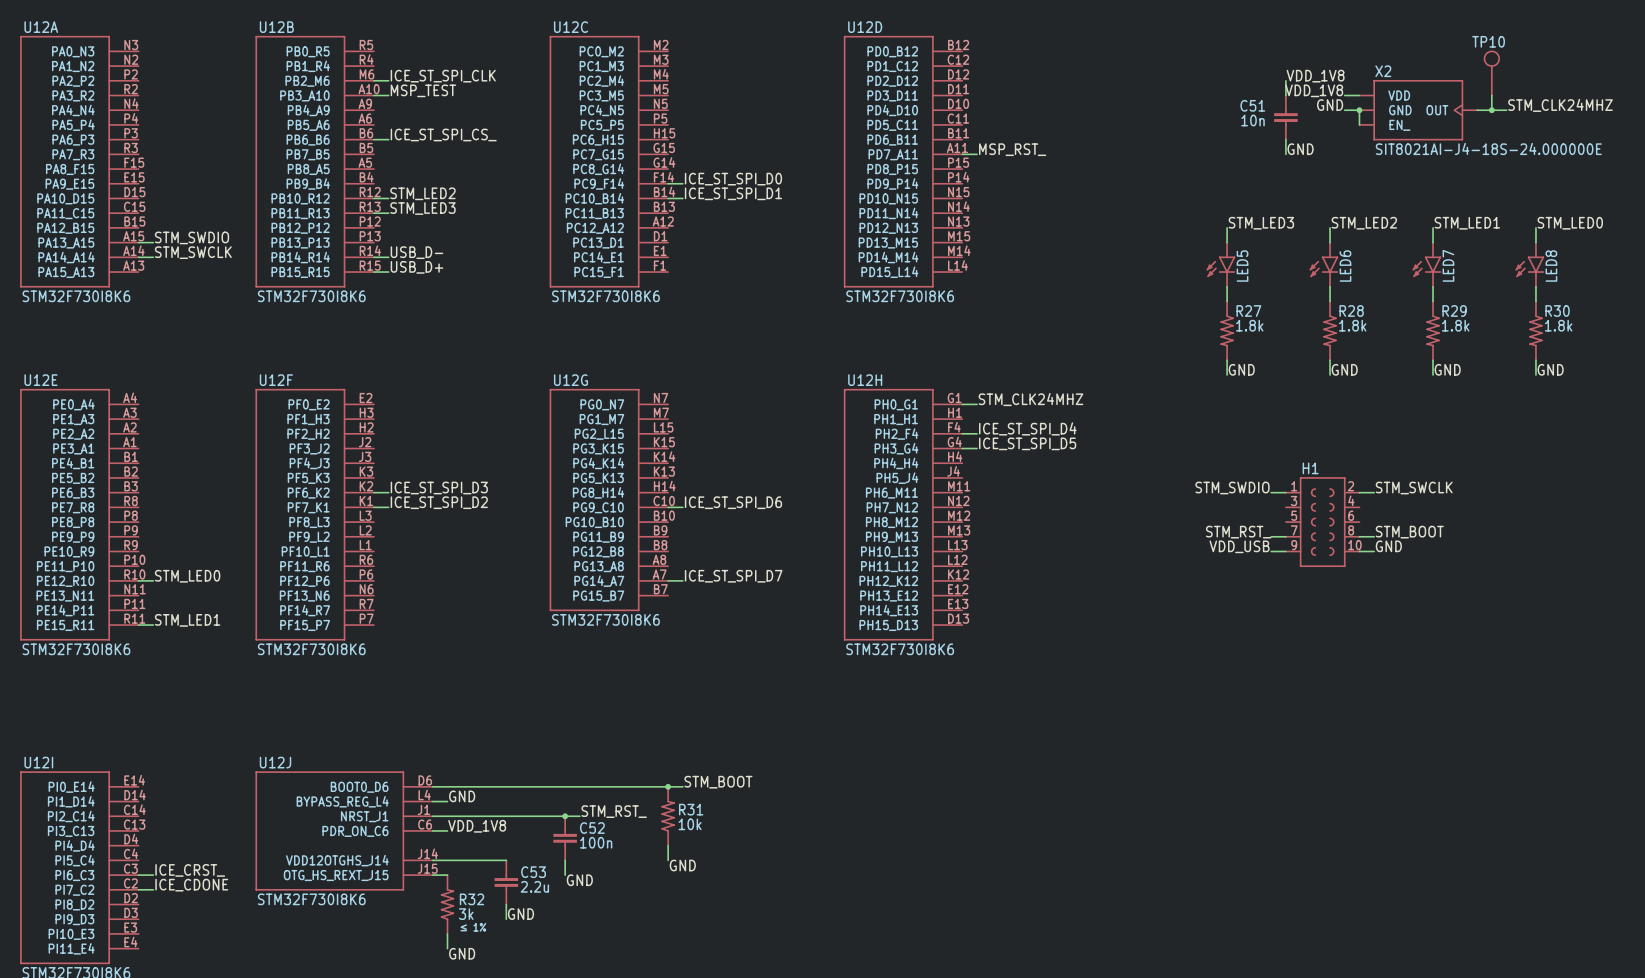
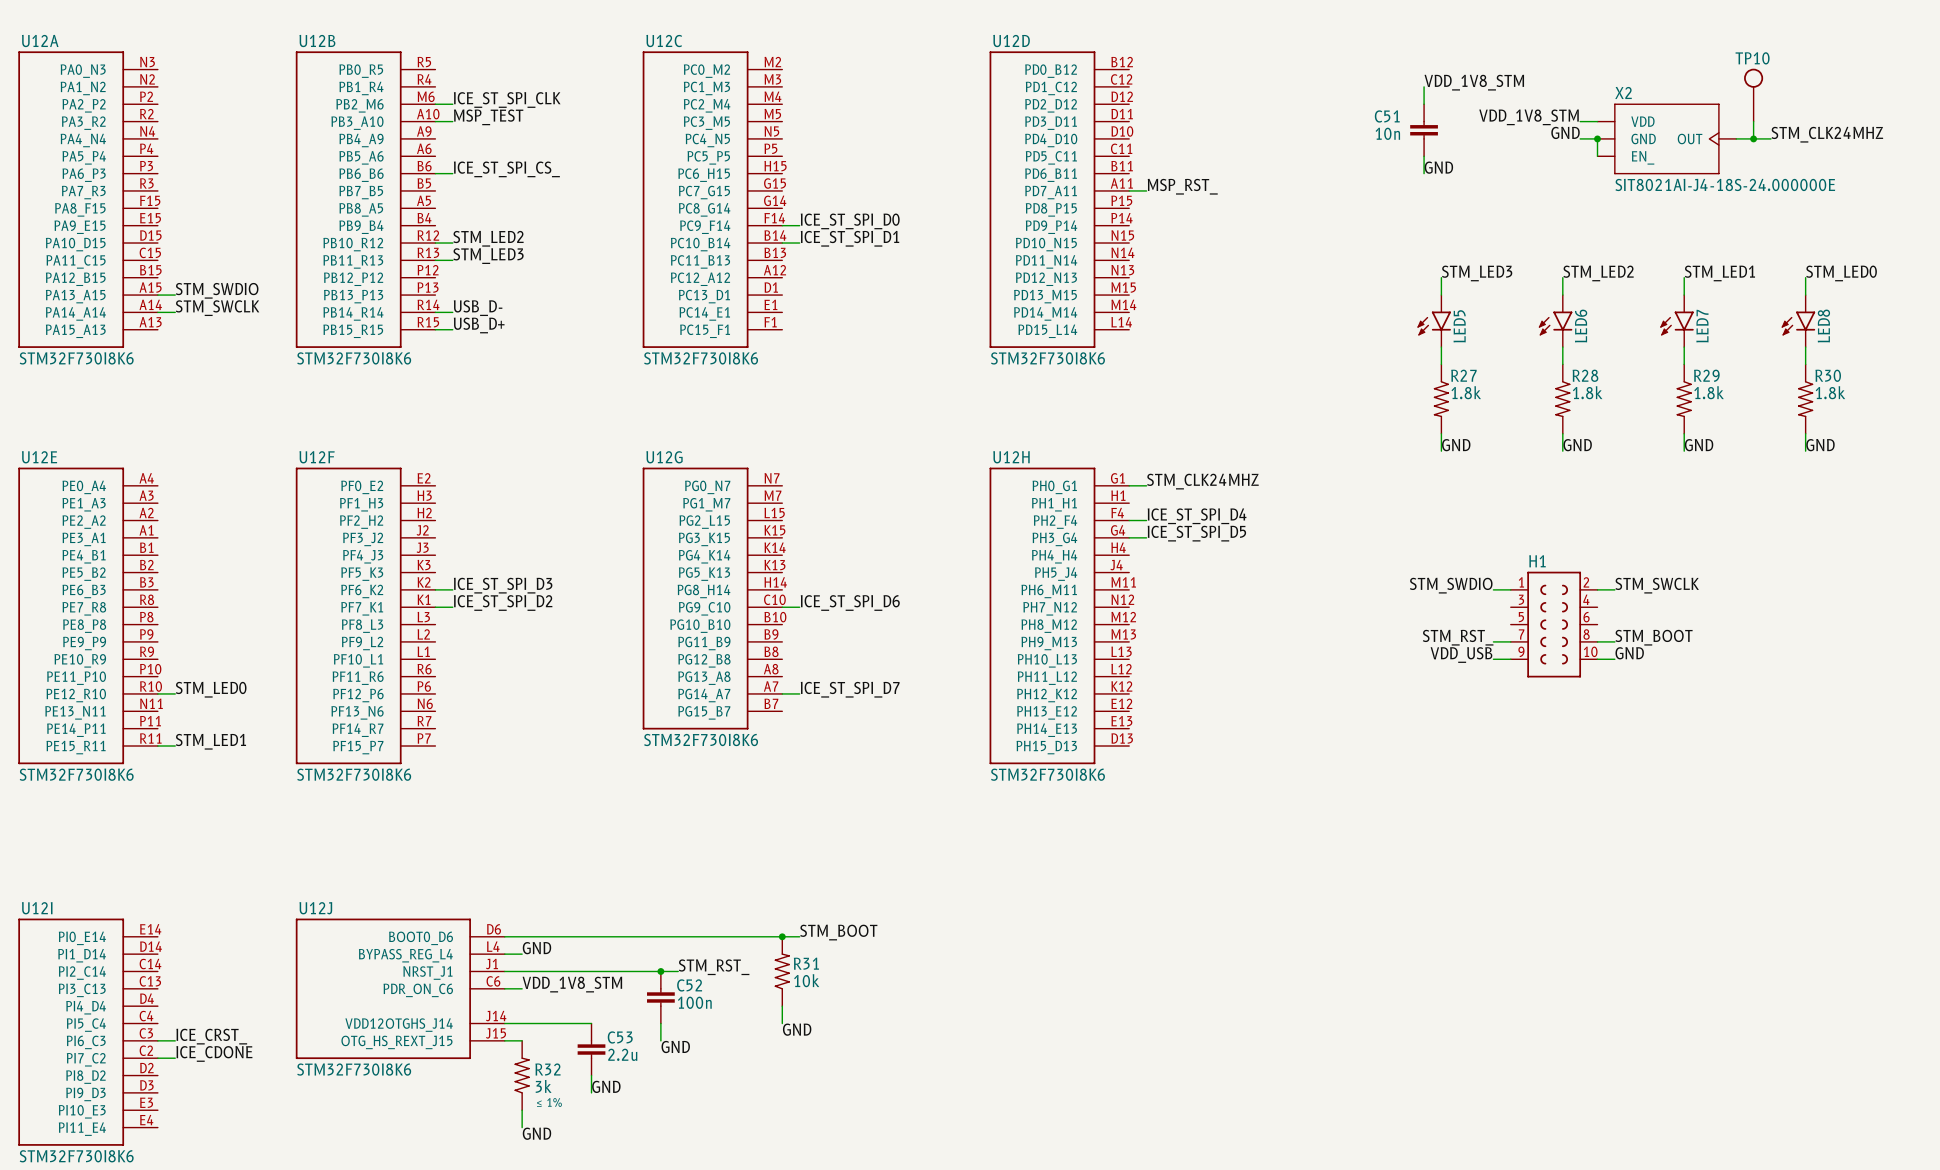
label: VDD_1V8 (1315, 76) -> VDD_1V8_STM (1474, 82)
wire: (1285, 80) (1285, 95) -> (1424, 86) (1424, 104)
label: VDD_1V8 (1314, 90) -> VDD_1V8_STM (1529, 117)
C51 position: (1285, 117) -> (1424, 130)
wire: (1285, 139) (1285, 154) -> (1424, 156) (1424, 173)
label position: GND (1300, 149) -> GND (1438, 167)
label: VDD_1V8 (477, 826) -> VDD_1V8_STM (572, 984)

